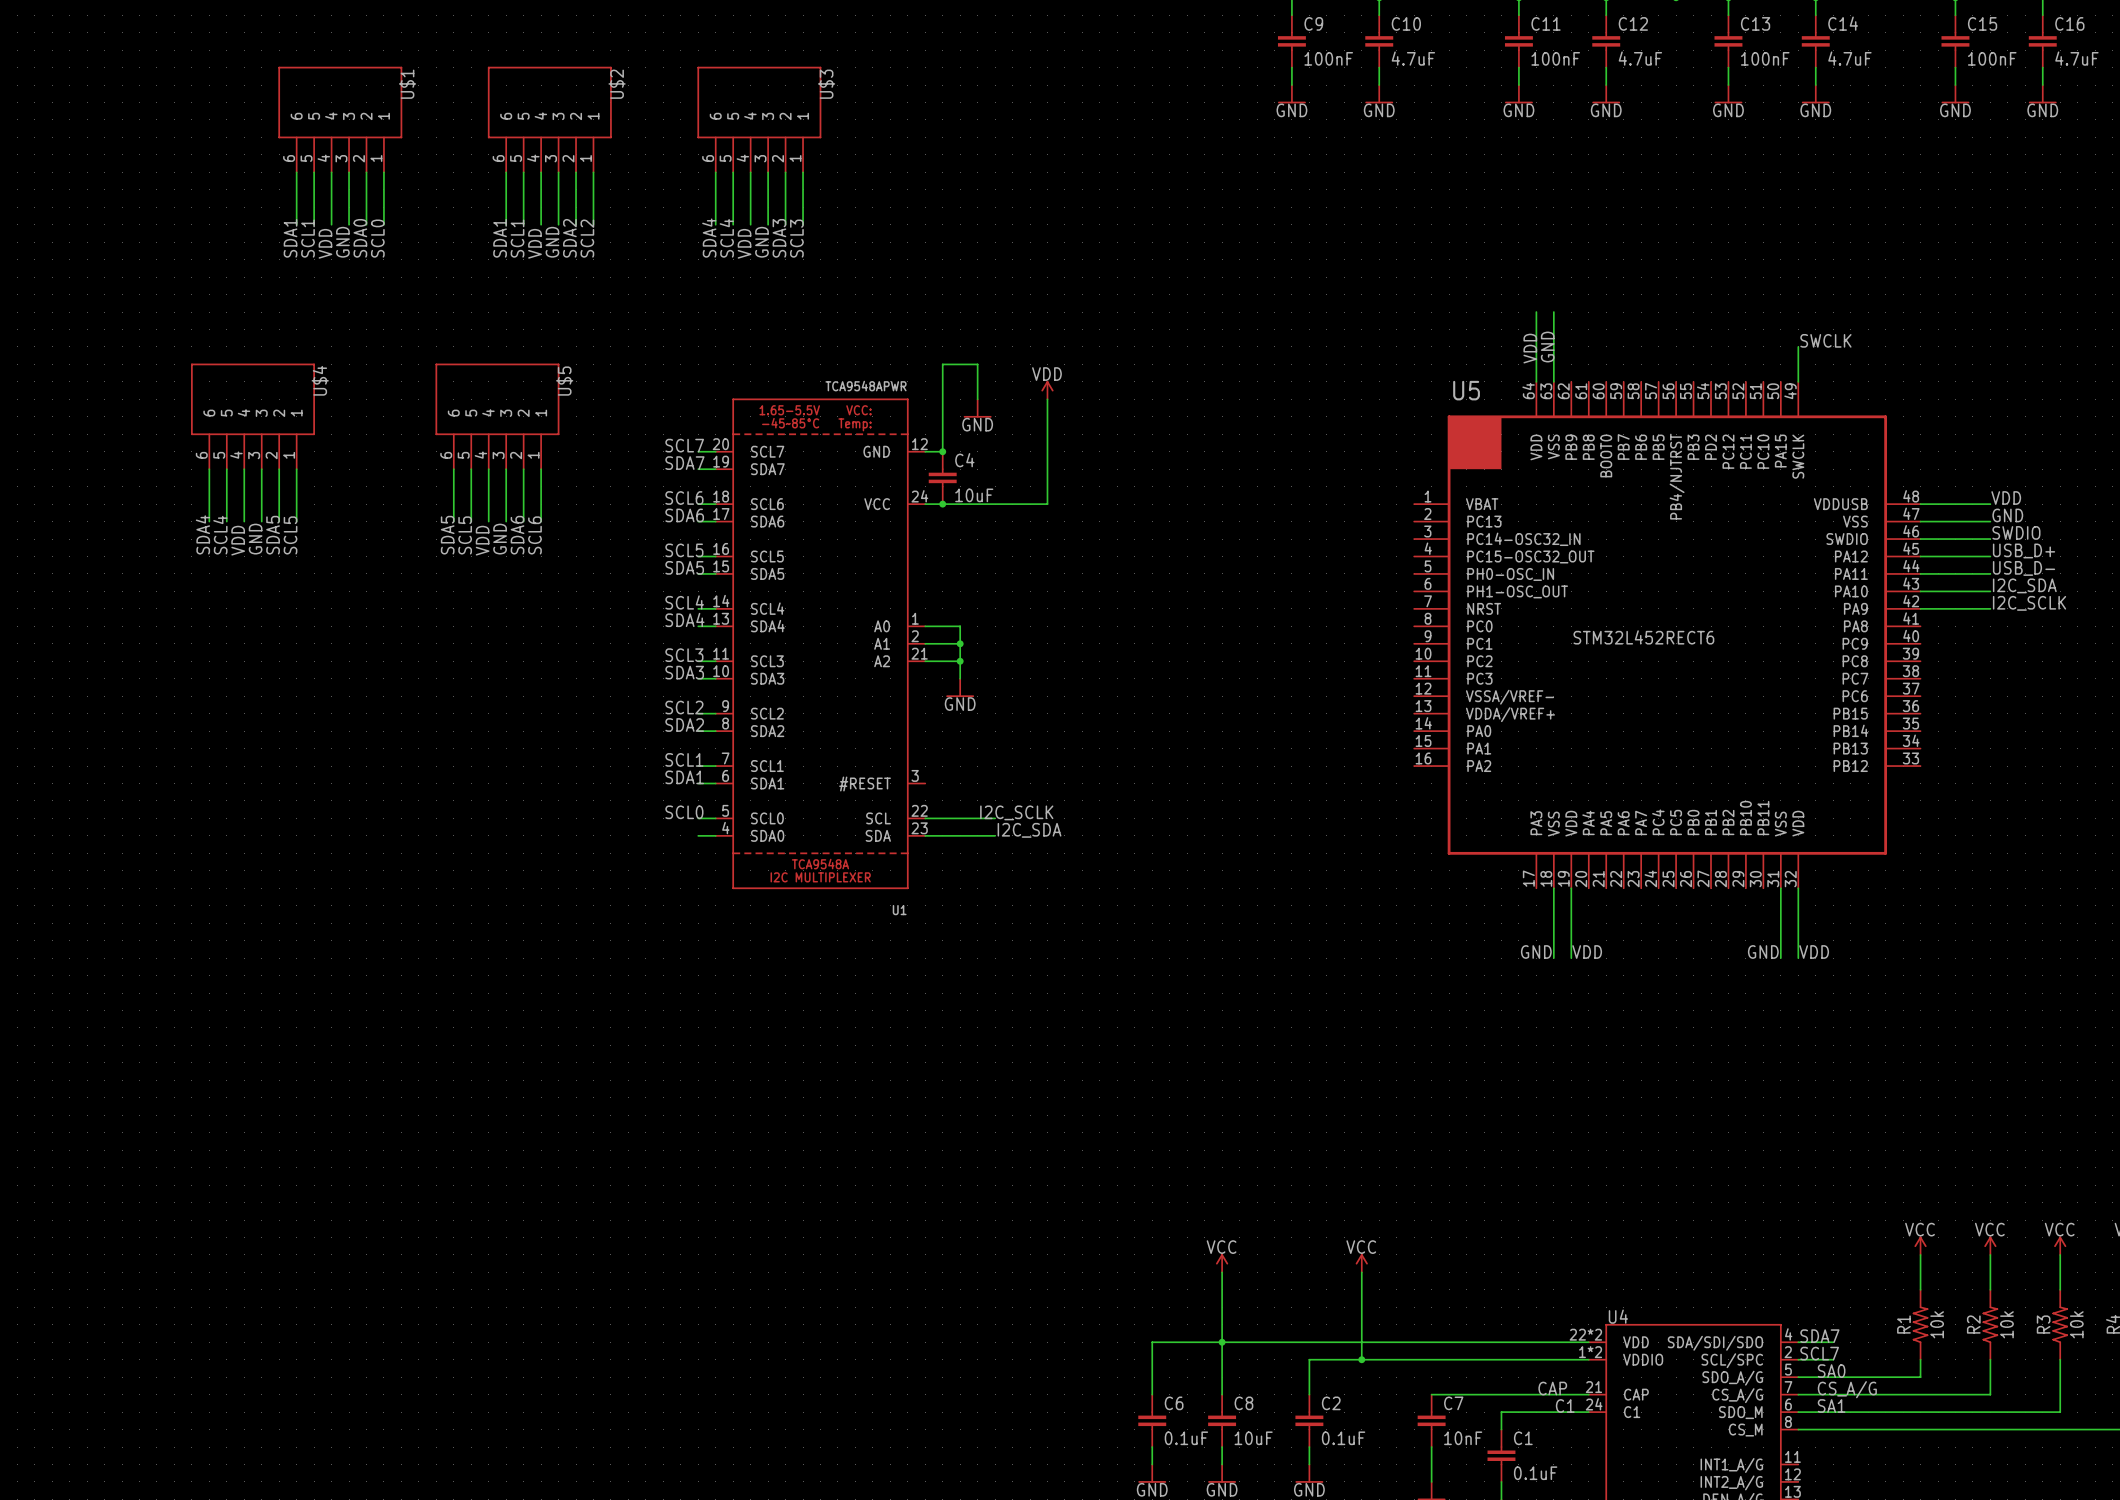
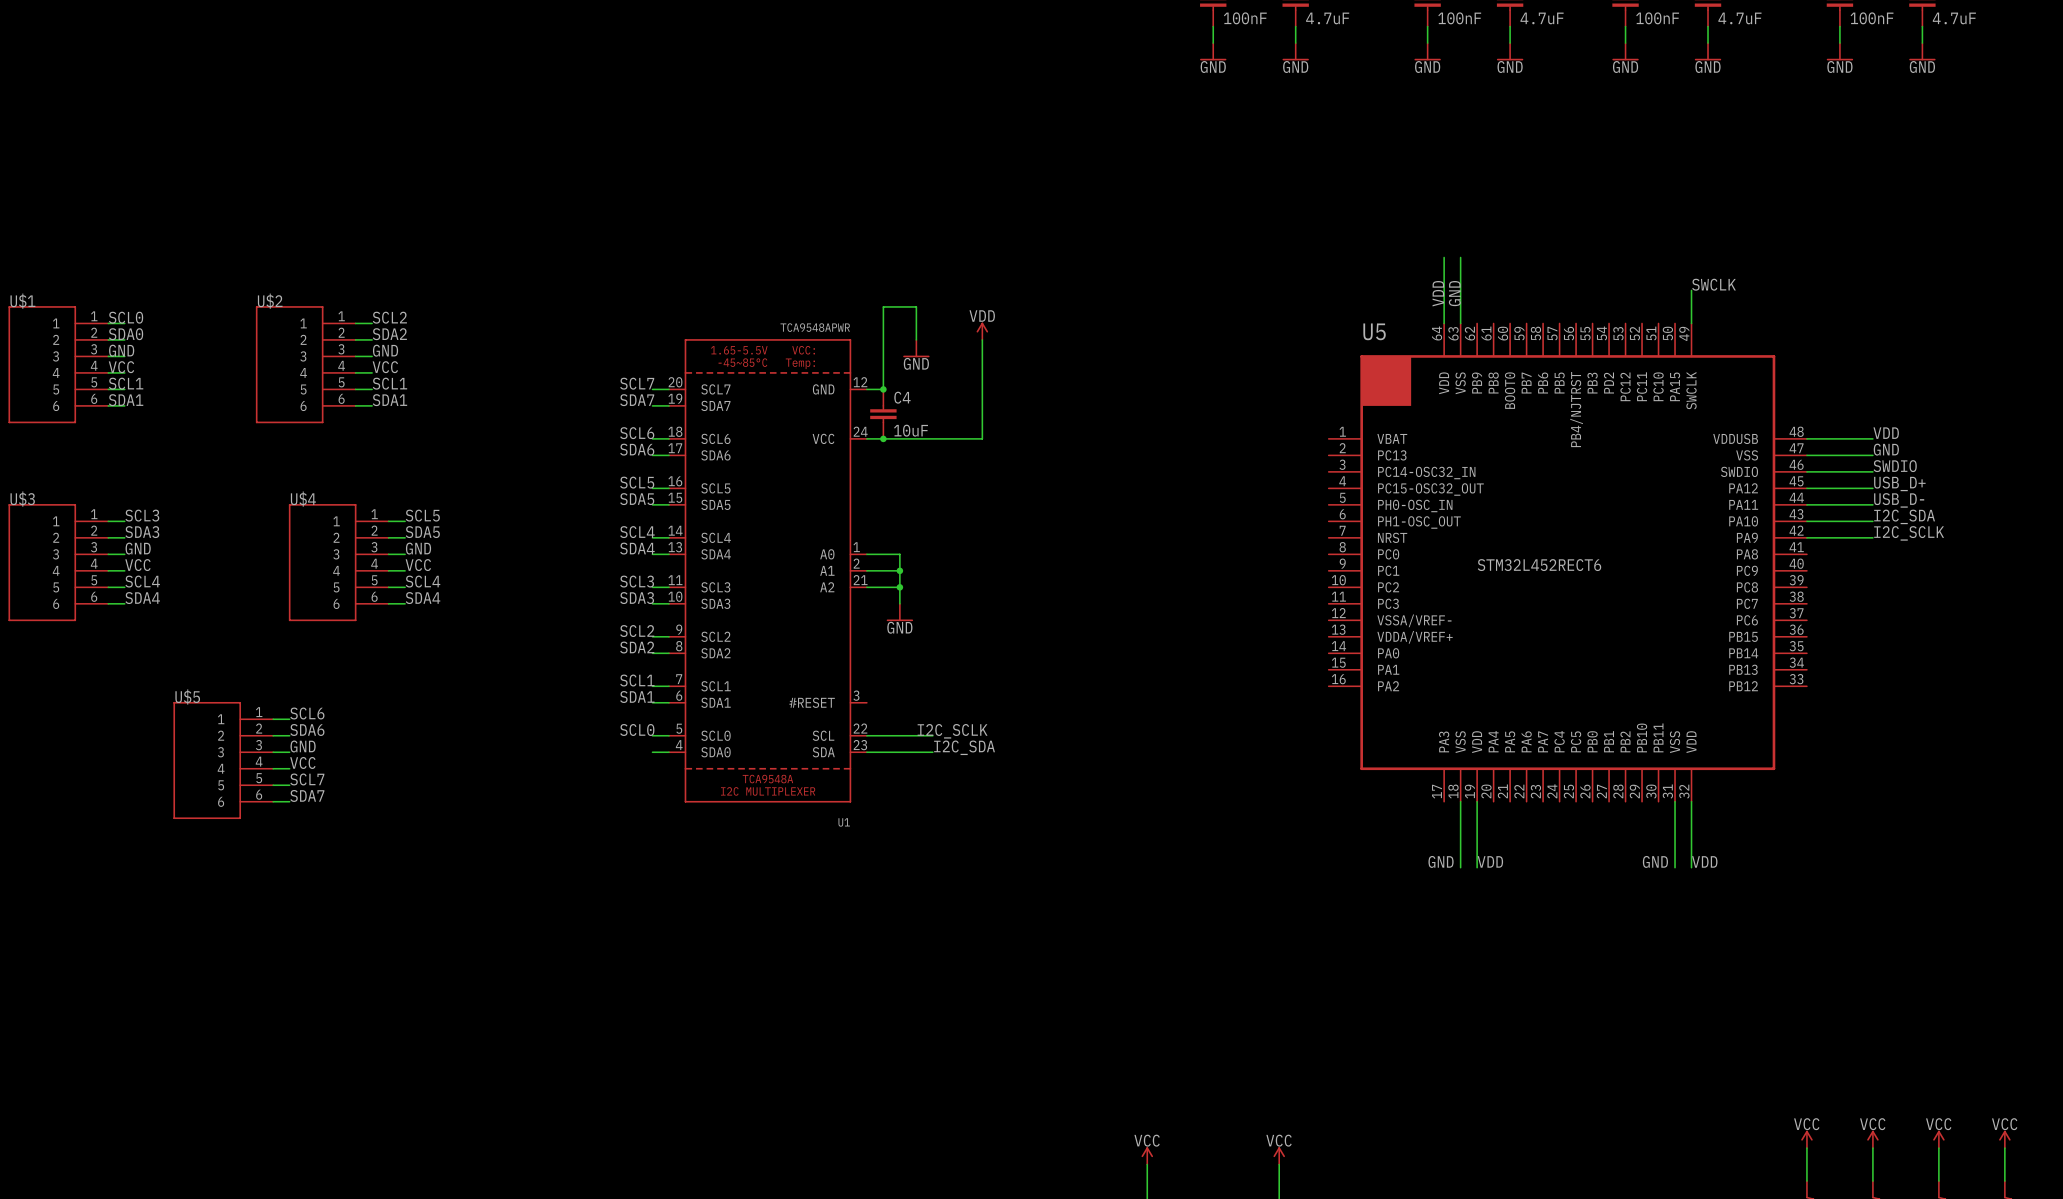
U$1 rotation: 0° (340, 102) -> 90° counterclockwise (42, 364)
U$2 rotation: 0° (549, 102) -> 90° counterclockwise (289, 364)
U$3 rotation: 0° (759, 102) -> 90° counterclockwise (42, 562)
U$1 position: (340, 119) -> (58, 364)
U$2 position: (549, 119) -> (305, 364)
U$3 position: (759, 119) -> (58, 562)
wire: (296, 172) (296, 224) -> none
wire: (314, 172) (314, 224) -> none
wire: (331, 172) (331, 224) -> none
wire: (349, 172) (349, 224) -> none
wire: (366, 172) (366, 224) -> none
wire: (383, 172) (383, 224) -> none
wire: (506, 172) (506, 224) -> none
wire: (523, 172) (523, 224) -> none
wire: (541, 172) (541, 224) -> none
wire: (558, 172) (558, 224) -> none
wire: (576, 172) (576, 224) -> none
wire: (593, 172) (593, 224) -> none
wire: (715, 172) (715, 224) -> none
wire: (733, 172) (733, 224) -> none
wire: (750, 172) (750, 224) -> none
wire: (768, 172) (768, 224) -> none
wire: (785, 172) (785, 224) -> none
wire: (803, 172) (803, 224) -> none
label: SDA1 (290, 238) -> none
label: SCL1 (308, 238) -> none
label: SDA0 (360, 238) -> none
label: SCL0 (377, 238) -> none
label: SDA1 (500, 238) -> none
label: SCL1 (517, 238) -> none
label: SDA2 (569, 238) -> none
label: SCL2 (587, 238) -> none
label: SDA4 (709, 238) -> none
label: SCL4 (726, 238) -> none
label: SDA3 (779, 238) -> none
label: SCL3 (796, 238) -> none
label: GND (342, 242) -> none
label: GND (552, 242) -> none
label: GND (761, 242) -> none
label: VDD (325, 243) -> none
label: VDD (534, 243) -> none
label: VDD (744, 243) -> none
label: none -> SCL0 (126, 317)
label: none -> SCL2 (389, 317)
wire: none -> (108, 323) (124, 323)
wire: none -> (355, 323) (372, 323)
label: none -> SDA0 (126, 334)
label: none -> SDA2 (389, 334)
wire: none -> (108, 339) (124, 339)
U$4 rotation: 0° (252, 399) -> 90° counterclockwise (322, 562)
wire: none -> (355, 339) (372, 339)
U$5 rotation: 0° (497, 399) -> 90° counterclockwise (207, 760)
label: none -> GND (121, 350)
label: none -> GND (385, 350)
wire: none -> (108, 356) (124, 356)
U$4 position: (252, 416) -> (338, 562)
wire: none -> (355, 356) (372, 356)
U$5 position: (497, 416) -> (223, 760)
label: none -> VCC (121, 367)
label: none -> VCC (385, 367)
wire: none -> (108, 372) (124, 372)
wire: none -> (355, 372) (372, 372)
label: none -> SCL1 (126, 383)
label: none -> SCL1 (389, 383)
wire: none -> (108, 389) (124, 389)
wire: none -> (355, 389) (372, 389)
label: none -> SDA1 (126, 400)
label: none -> SDA1 (389, 400)
wire: none -> (108, 405) (124, 405)
wire: (209, 469) (209, 521) -> none
wire: (226, 469) (226, 521) -> none
wire: (244, 469) (244, 521) -> none
wire: (261, 469) (261, 521) -> none
wire: (279, 469) (279, 521) -> none
wire: (296, 469) (296, 521) -> none
wire: none -> (355, 405) (372, 405)
wire: (453, 469) (453, 521) -> none
wire: (471, 469) (471, 521) -> none
wire: (488, 469) (488, 521) -> none
wire: (506, 469) (506, 521) -> none
wire: (523, 469) (523, 521) -> none
wire: (541, 469) (541, 521) -> none
label: SDA4 (202, 534) -> none
label: SCL4 (220, 535) -> none
label: SDA5 (273, 535) -> none
label: SCL5 (290, 535) -> none
label rotation: 0° (447, 535) -> 90° clockwise (422, 532)
label position: SDA5 (447, 535) -> SDA5 (422, 532)
label rotation: 0° (465, 535) -> 90° clockwise (422, 515)
label position: SCL5 (465, 535) -> SCL5 (422, 515)
label: SDA6 (517, 535) -> none
label: SCL6 (534, 535) -> none
label: GND (255, 539) -> none
label: GND (500, 539) -> none
label: VDD (238, 540) -> none
label: VDD (482, 540) -> none
label: none -> SCL3 (142, 515)
wire: none -> (108, 521) (124, 521)
wire: none -> (388, 521) (405, 521)
label: none -> SDA3 (142, 532)
wire: none -> (108, 537) (124, 537)
wire: none -> (388, 537) (405, 537)
label: none -> GND (138, 548)
label: none -> GND (418, 548)
wire: none -> (108, 554) (124, 554)
wire: none -> (388, 554) (405, 554)
label: none -> VCC (137, 565)
label: none -> VCC (418, 565)
wire: none -> (108, 570) (124, 570)
wire: none -> (388, 570) (405, 570)
label: none -> SCL4 (142, 581)
label: none -> SCL4 (423, 581)
wire: none -> (108, 587) (124, 587)
wire: none -> (388, 587) (405, 587)
label: none -> SDA4 (142, 598)
label: none -> SDA4 (423, 598)
wire: none -> (108, 603) (124, 603)
wire: none -> (388, 603) (405, 603)
label: none -> SCL6 (307, 713)
wire: none -> (273, 719) (289, 719)
label: none -> SDA6 (307, 729)
wire: none -> (273, 735) (289, 735)
label: none -> GND (303, 746)
wire: none -> (273, 752) (289, 752)
label: none -> VCC (302, 762)
wire: none -> (273, 768) (289, 768)
label: none -> SCL7 (307, 779)
wire: none -> (273, 785) (289, 785)
label: none -> SDA7 (307, 795)
wire: none -> (273, 801) (289, 801)

